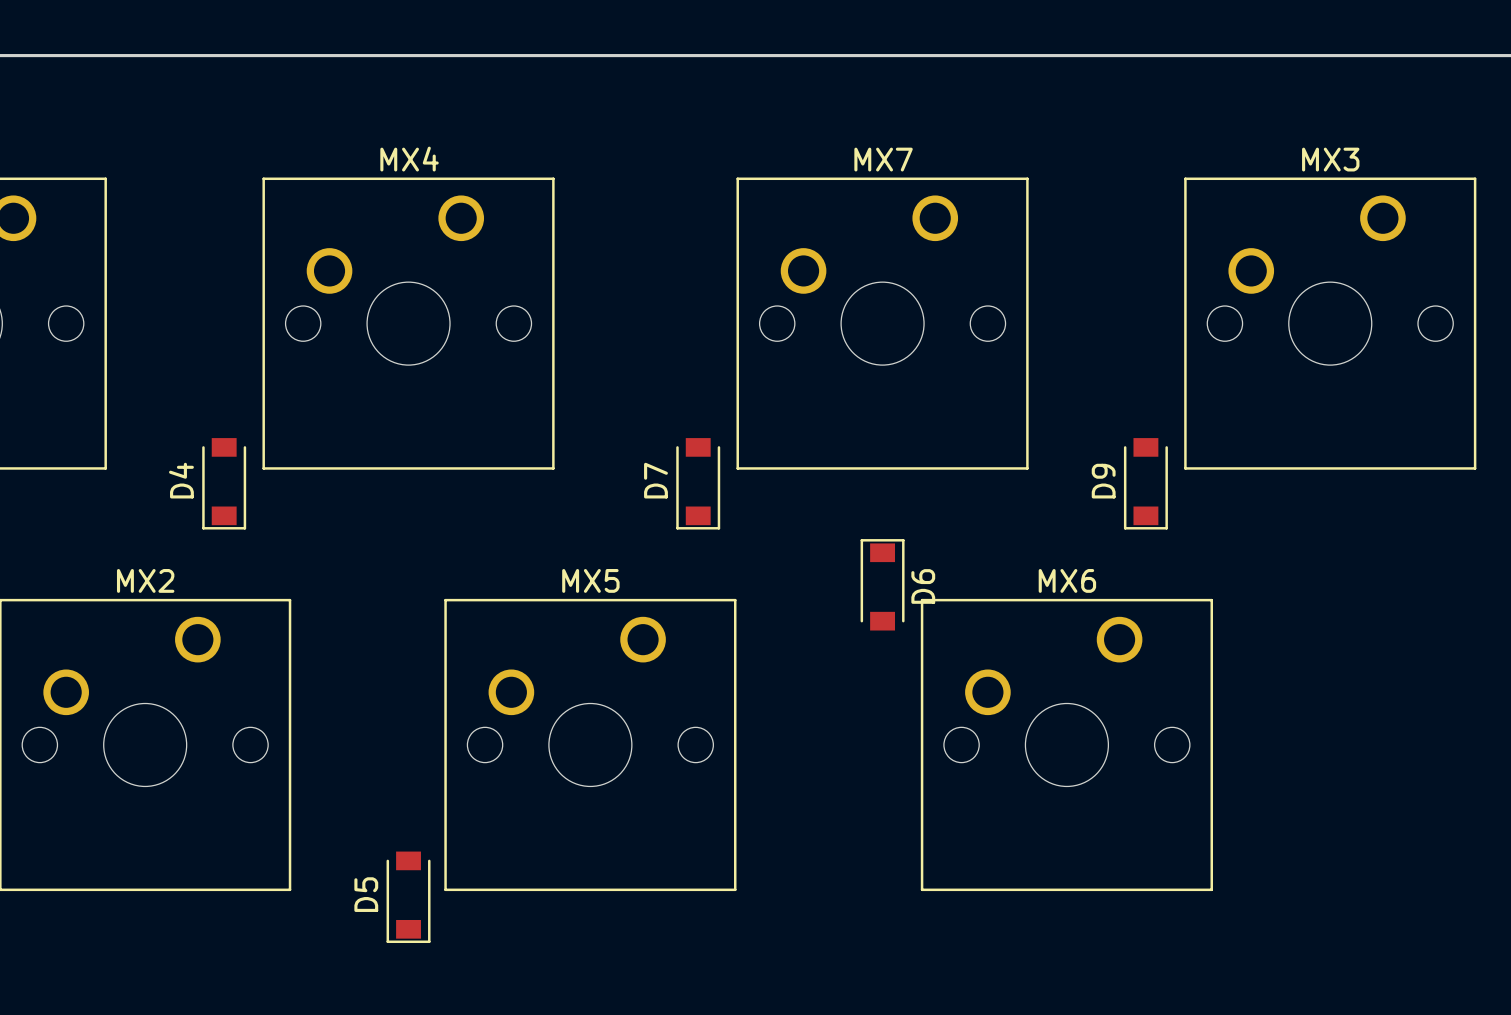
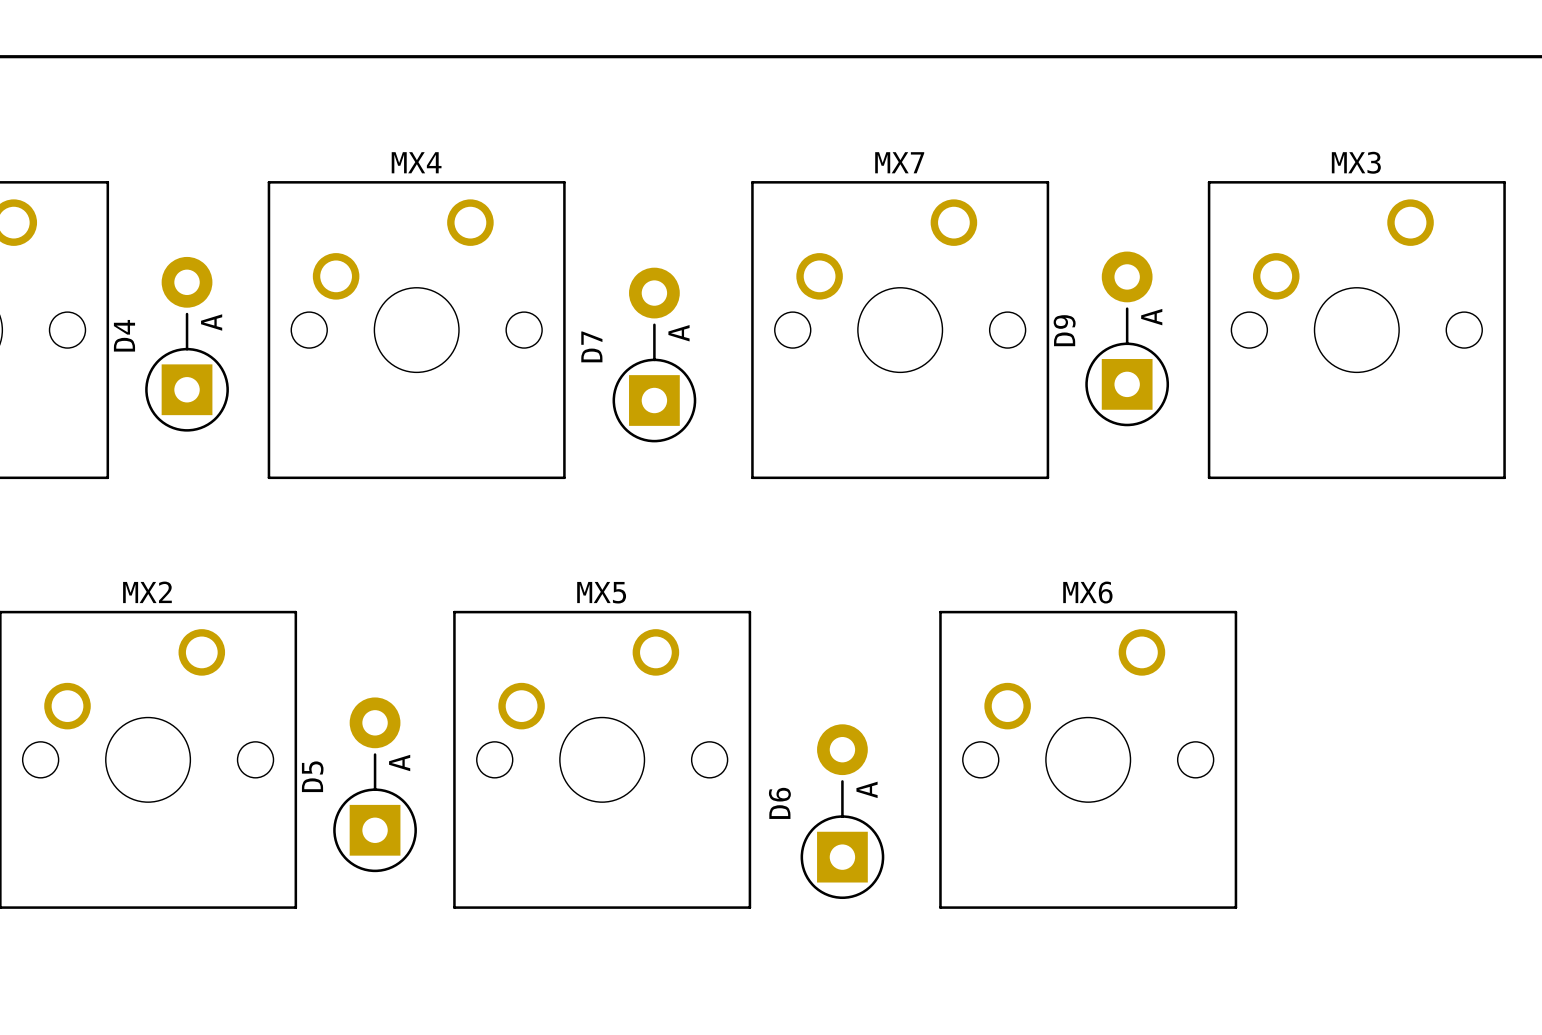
D4 footprint: [202, 438, 247, 530] -> [145, 256, 229, 432]
D7 footprint: [676, 438, 721, 530] -> [612, 267, 697, 443]
D9 footprint: [1123, 438, 1168, 530] -> [1085, 251, 1170, 427]
D6 footprint: [860, 539, 905, 631] -> [800, 724, 885, 900]
D6 name position: D6 (923, 586) -> D6 (779, 803)
D5 footprint: [386, 851, 431, 944] -> [333, 697, 417, 873]

